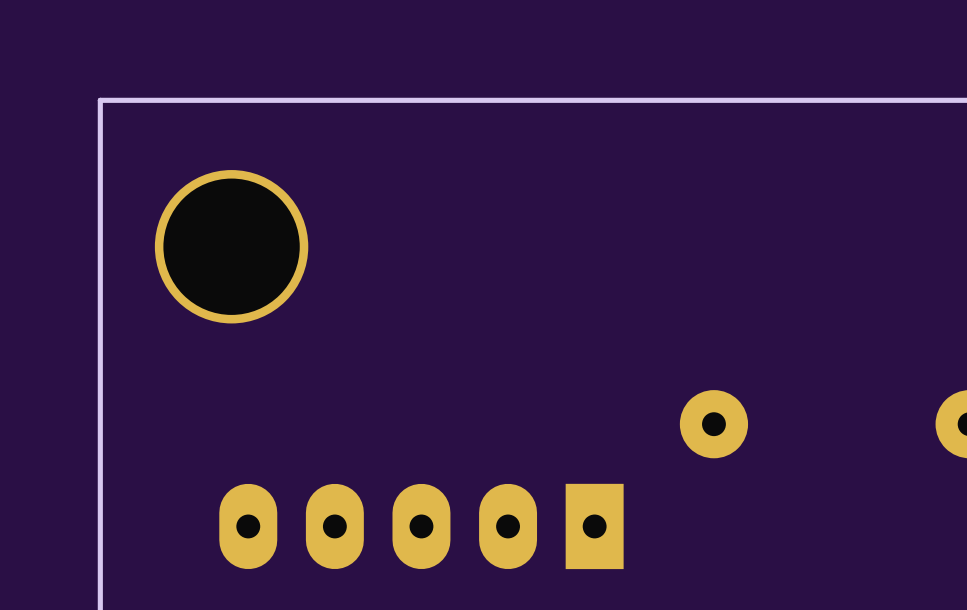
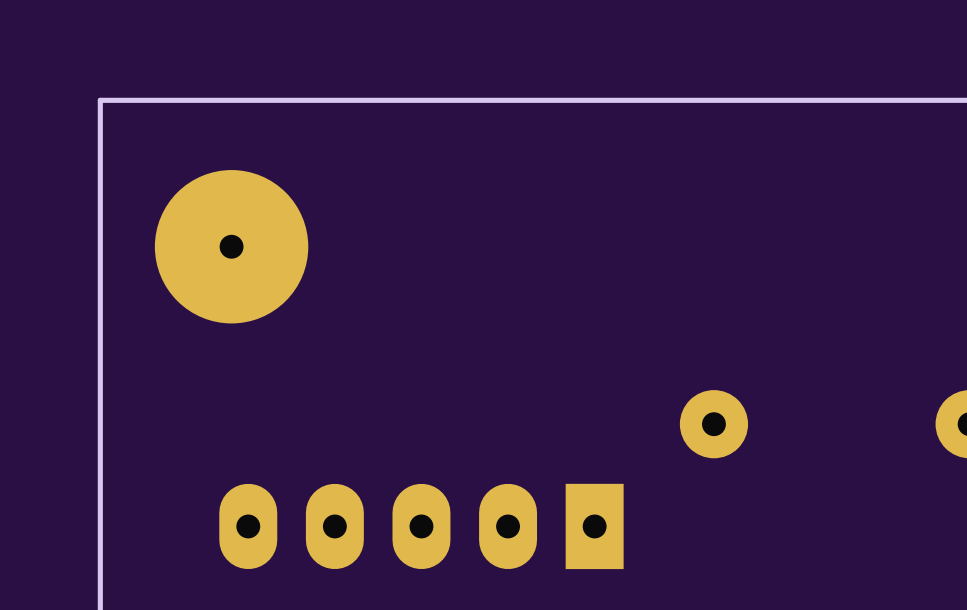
part footprint: [154, 170, 309, 324] -> [154, 170, 309, 324]

